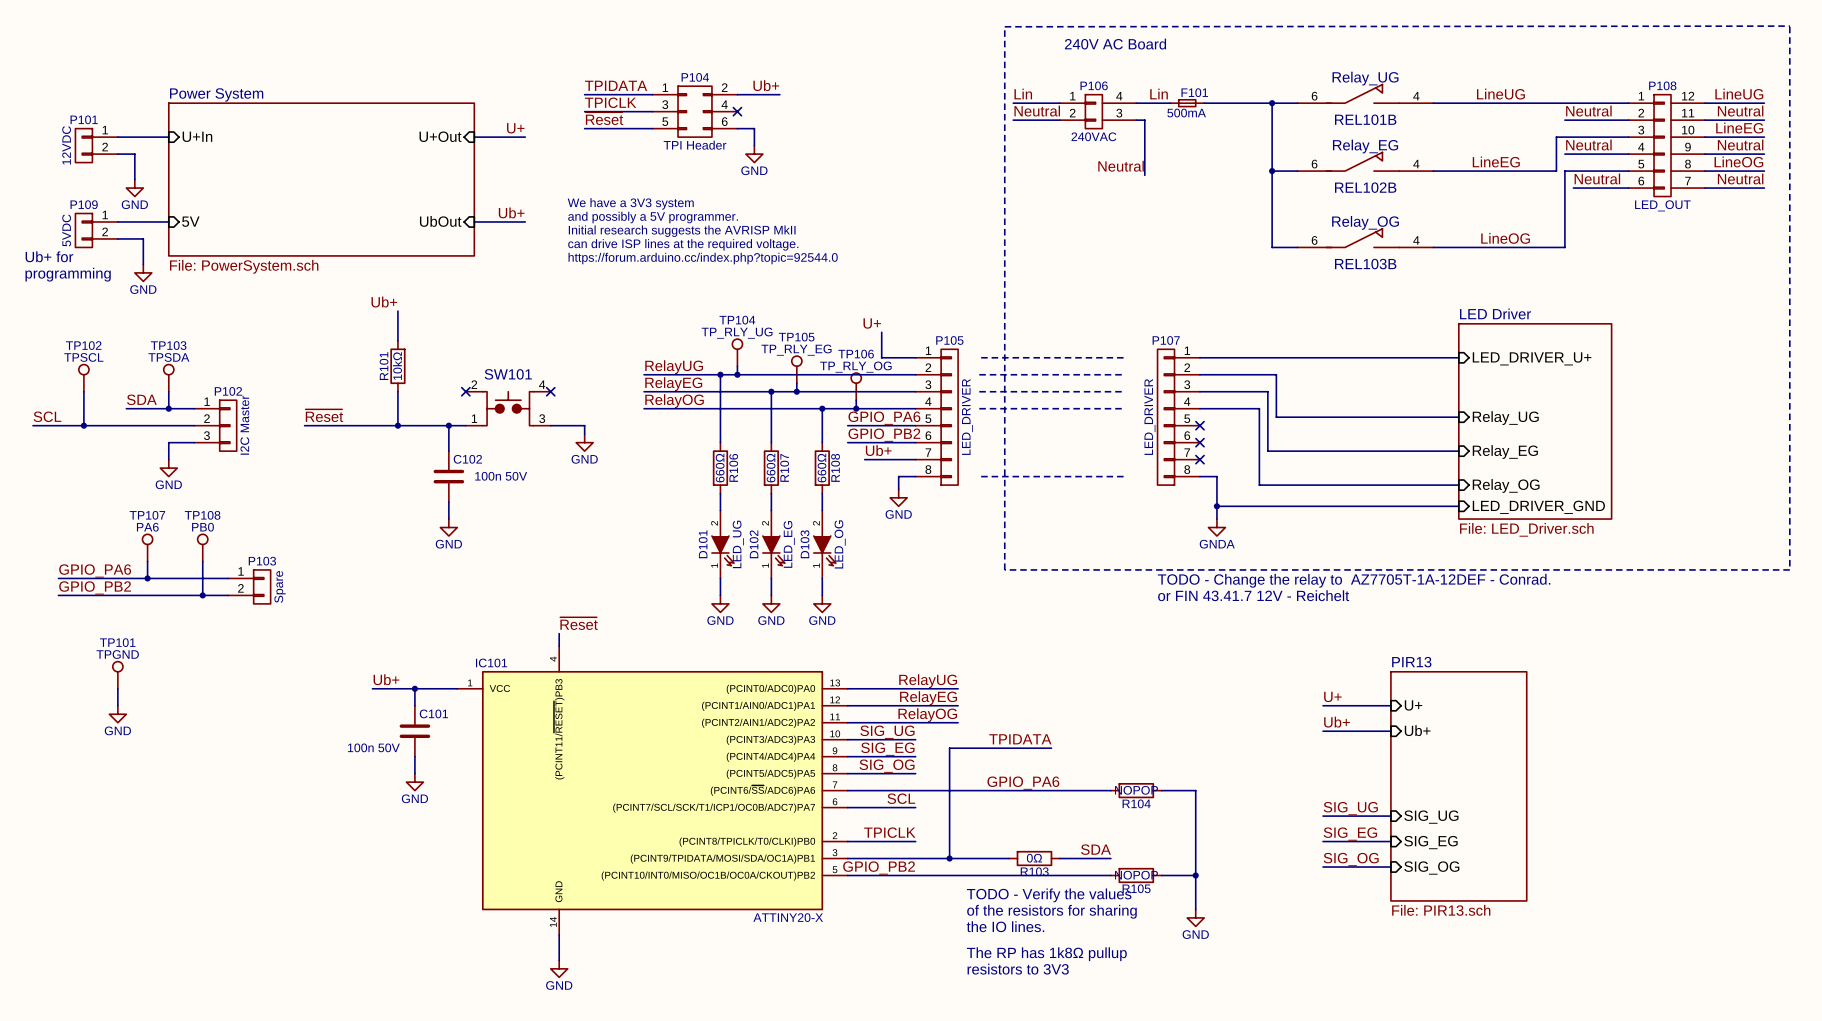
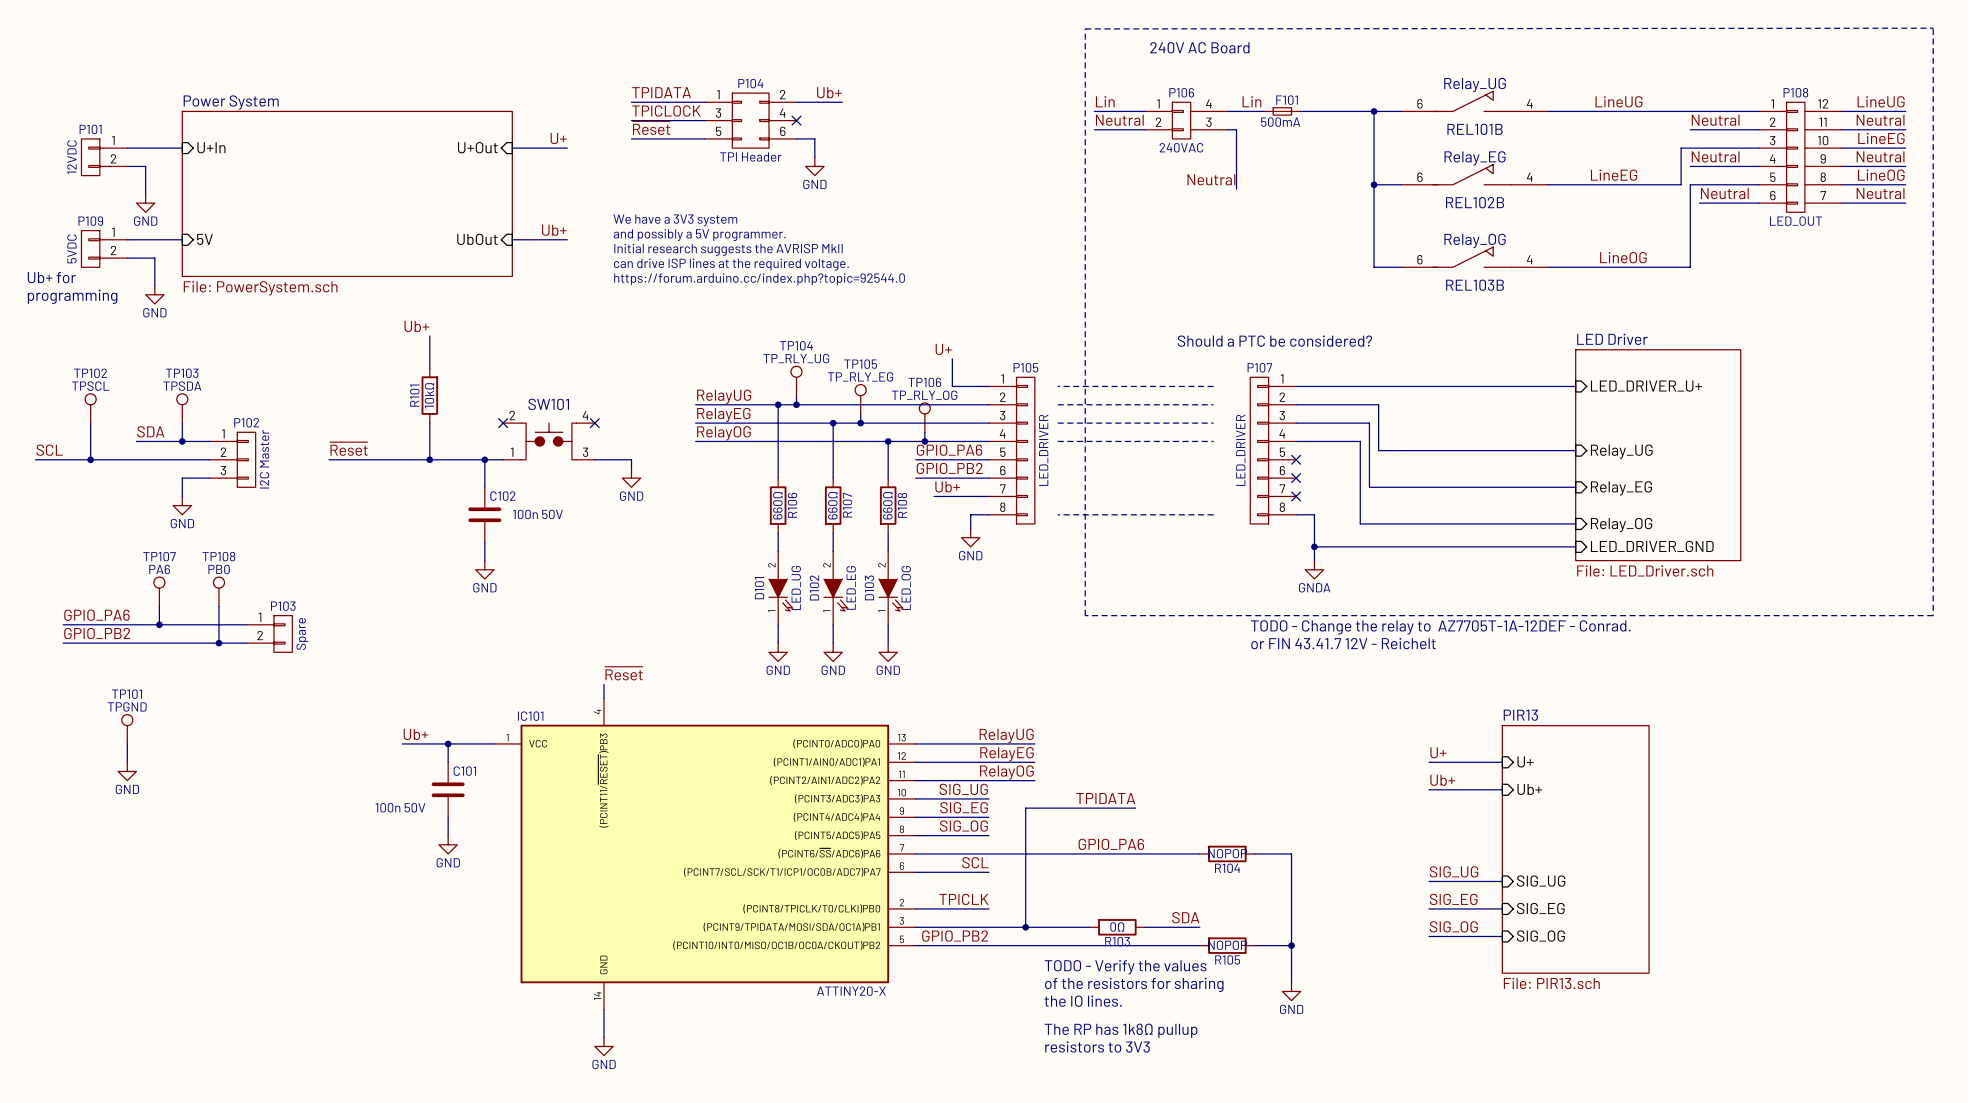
label: TPICLK (610, 102) -> TPICLOCK (666, 111)
text: none -> Should a PTC be considered? (1274, 341)

